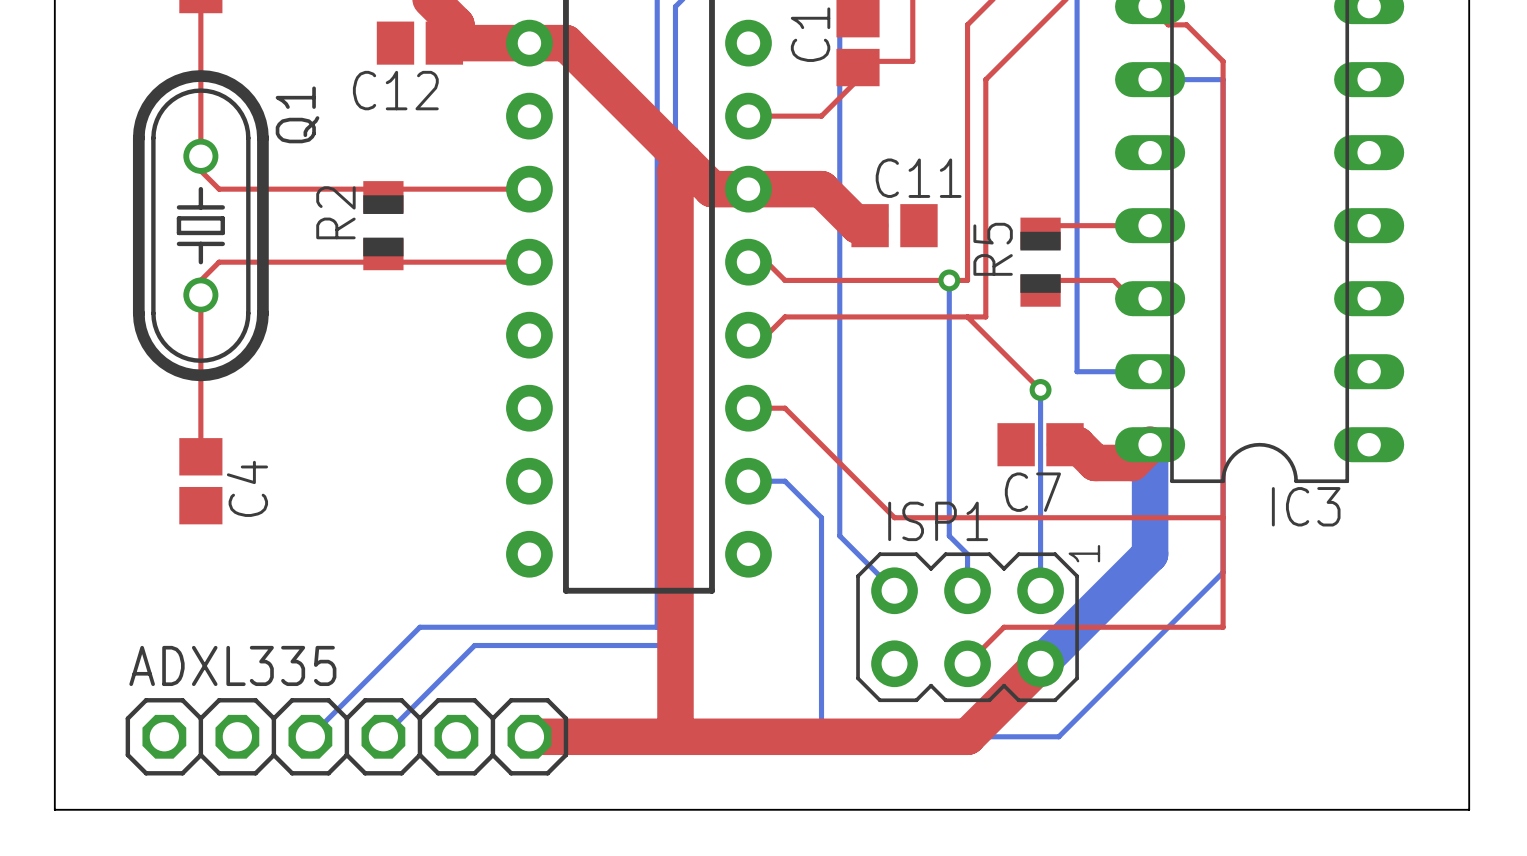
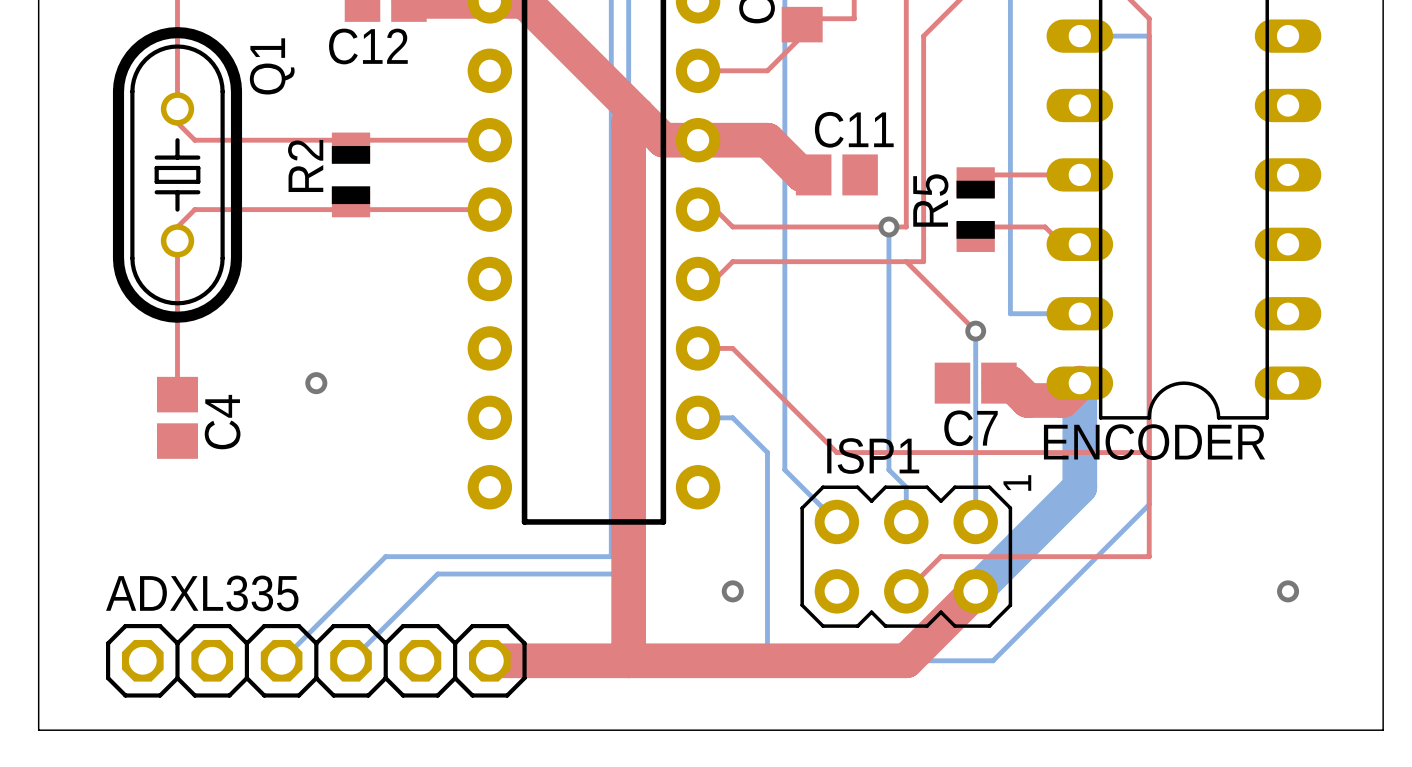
via: none -> (316, 383)
IC3 name: IC3 (1306, 506) -> ENCODER (1154, 442)
via: none -> (732, 591)
via: none -> (1288, 591)

